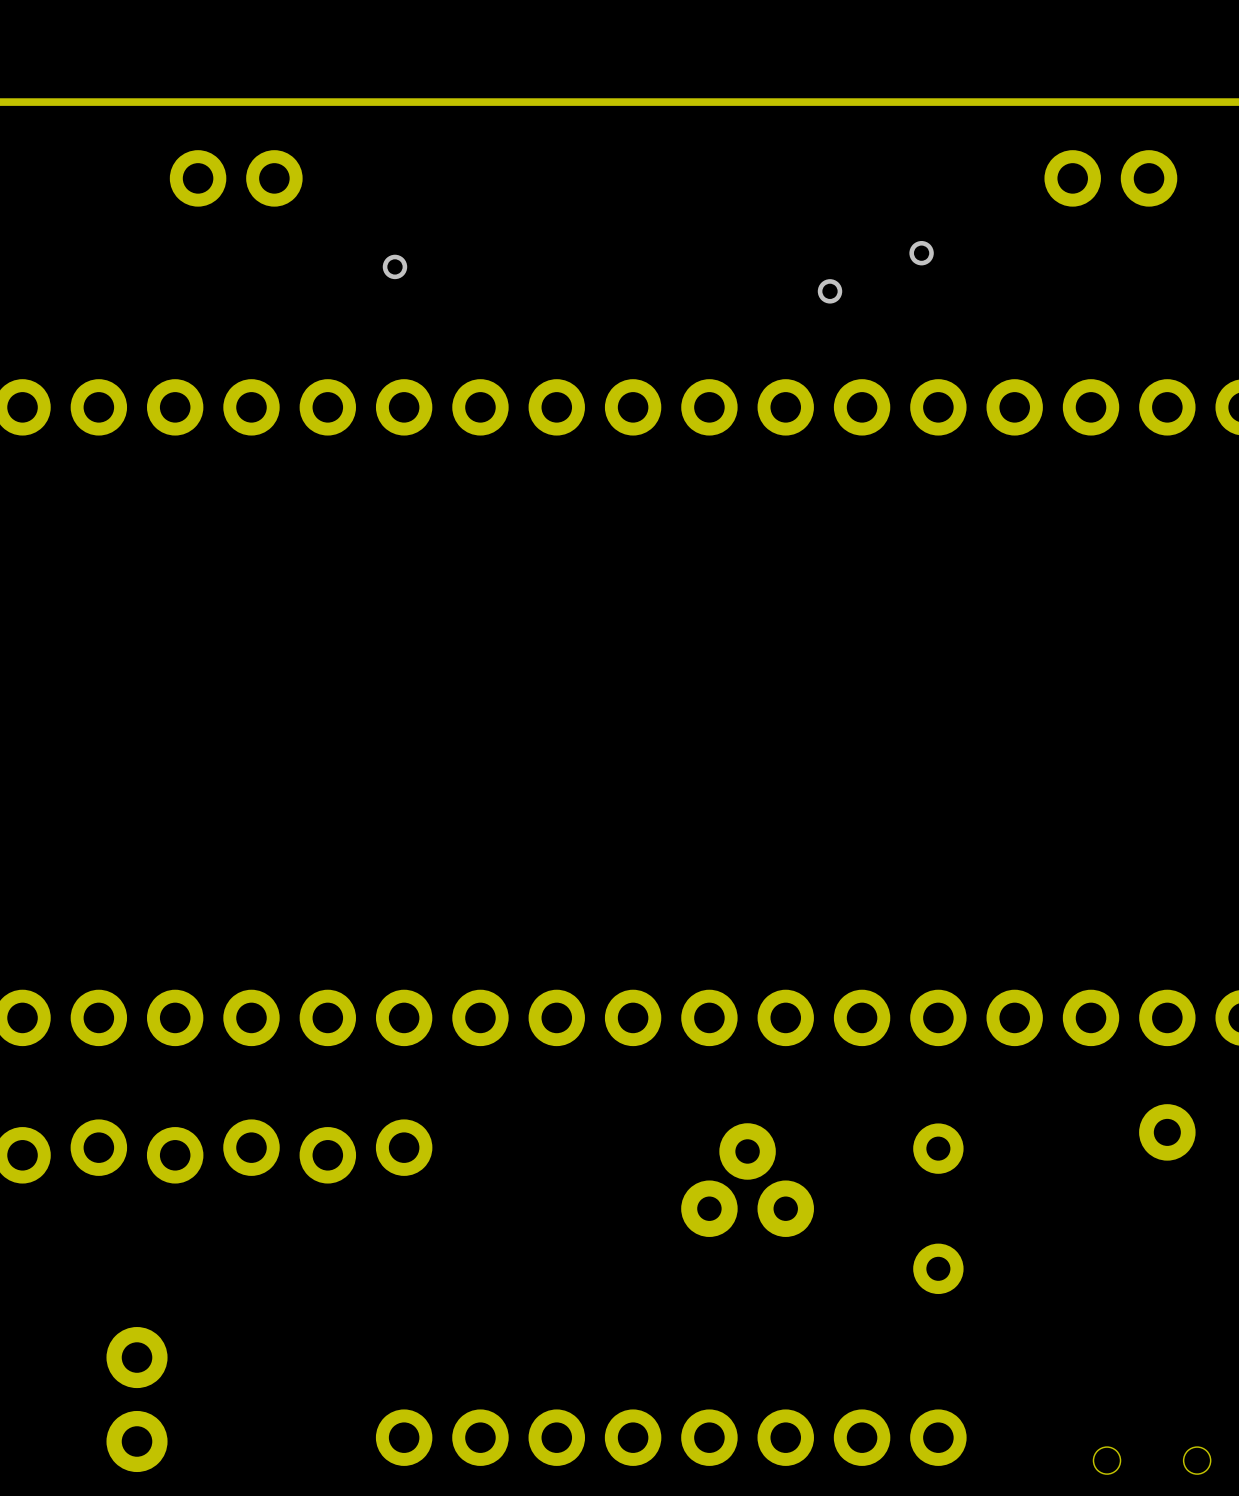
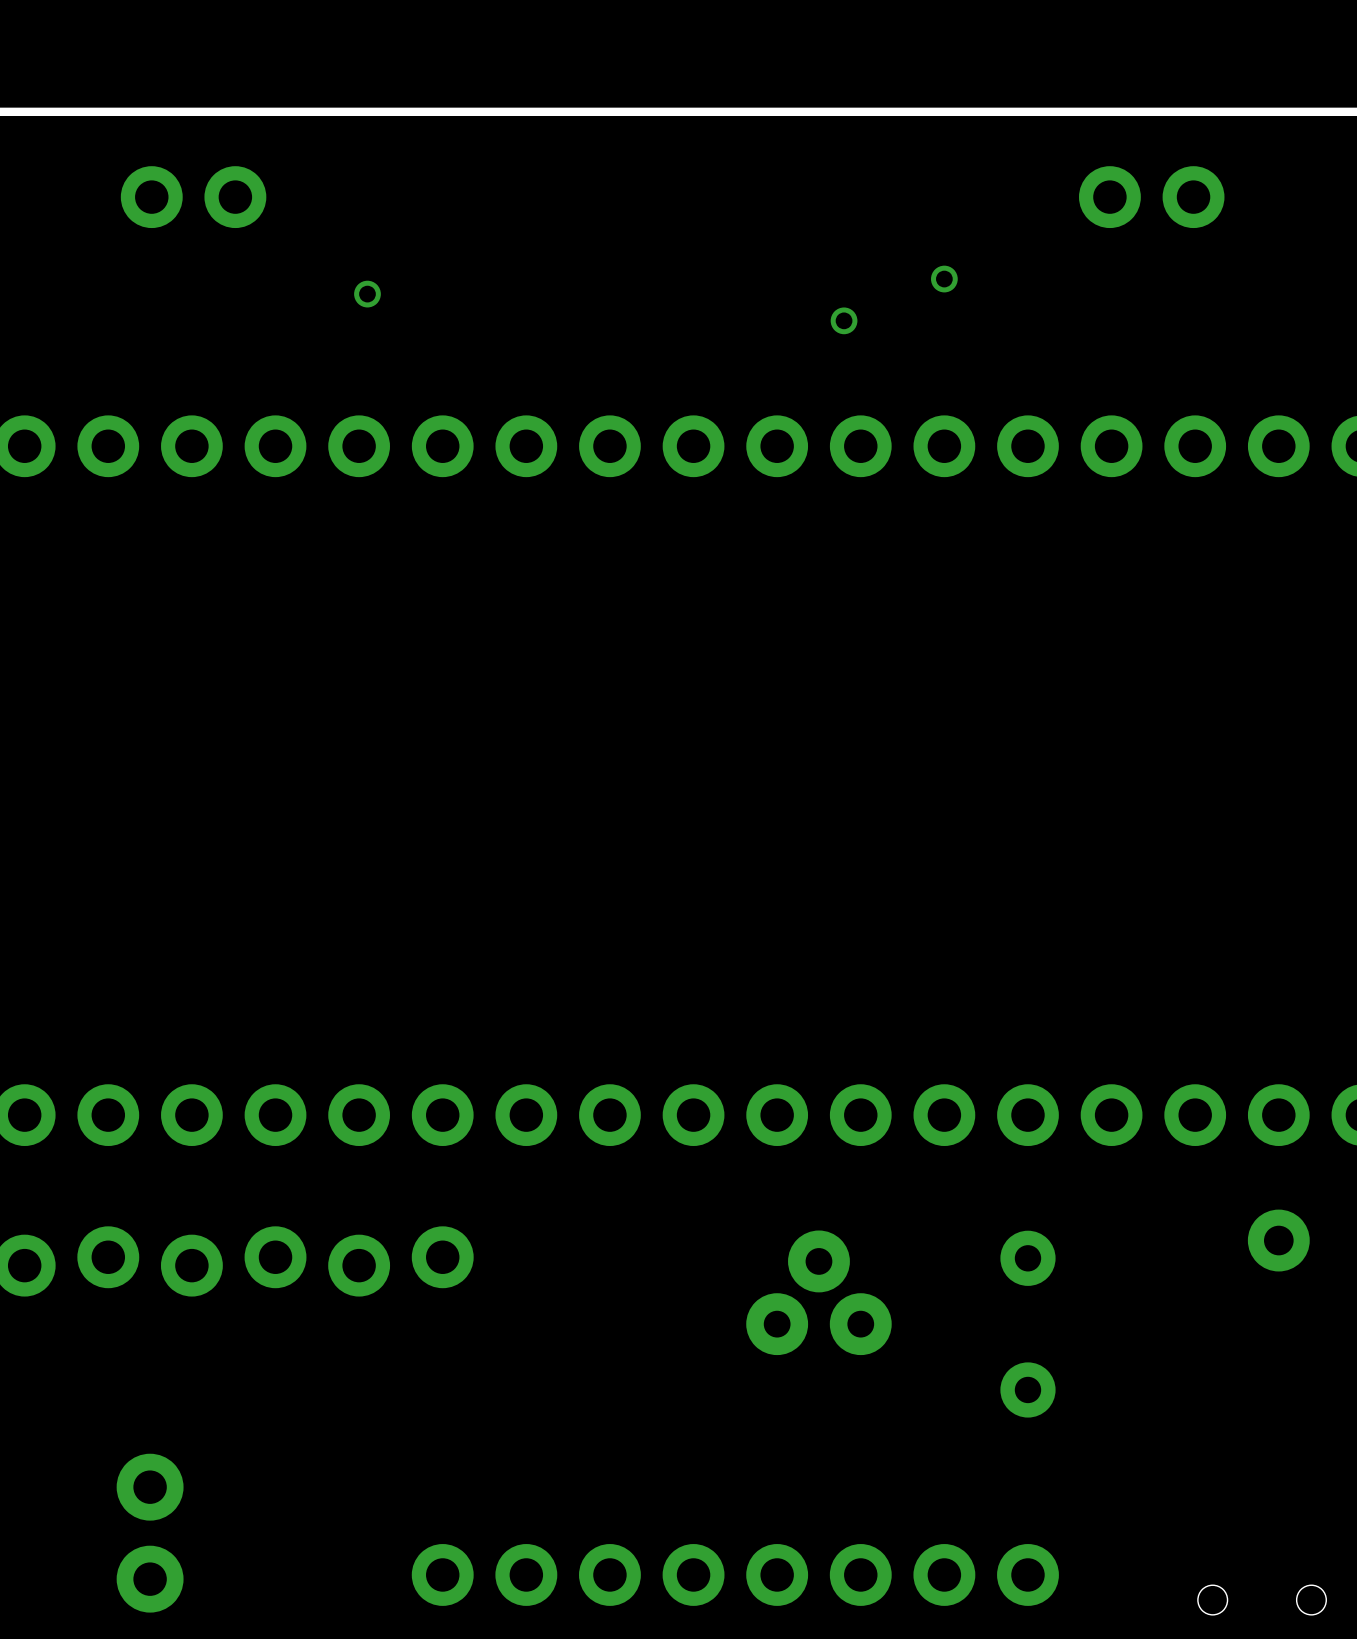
part position: (236, 178) -> (193, 197)
part position: (1110, 178) -> (1151, 197)
via: (921, 253) -> none
via: none -> (944, 279)
via position: (394, 266) -> (367, 294)
via: (830, 291) -> none
via: none -> (844, 320)

